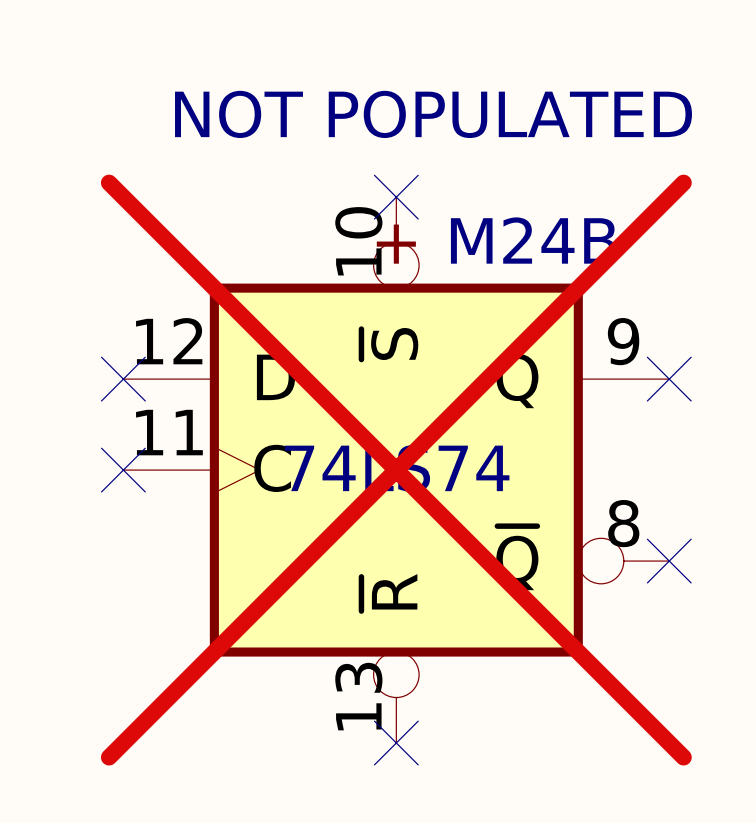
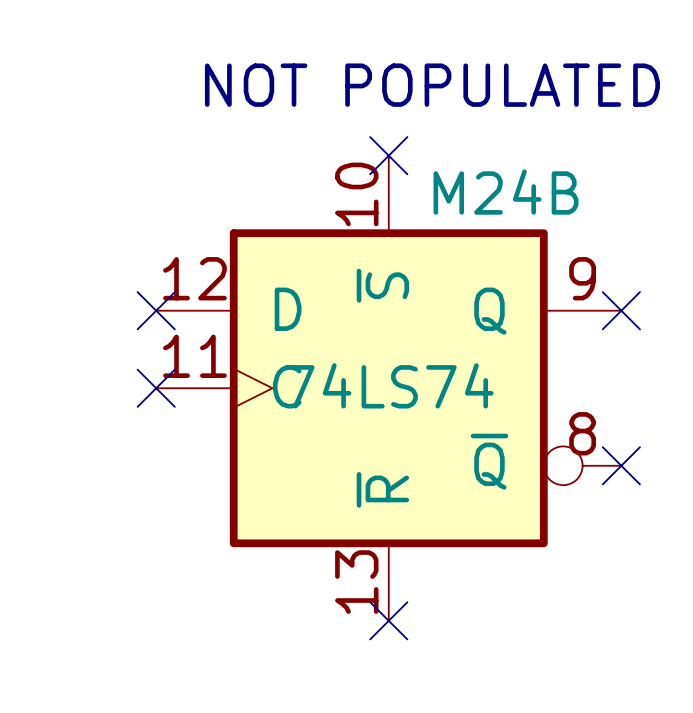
M24B symbol: [123, 197, 670, 744] -> [156, 155, 622, 621]
M24B do-not-place cross: (396, 470) -> none

